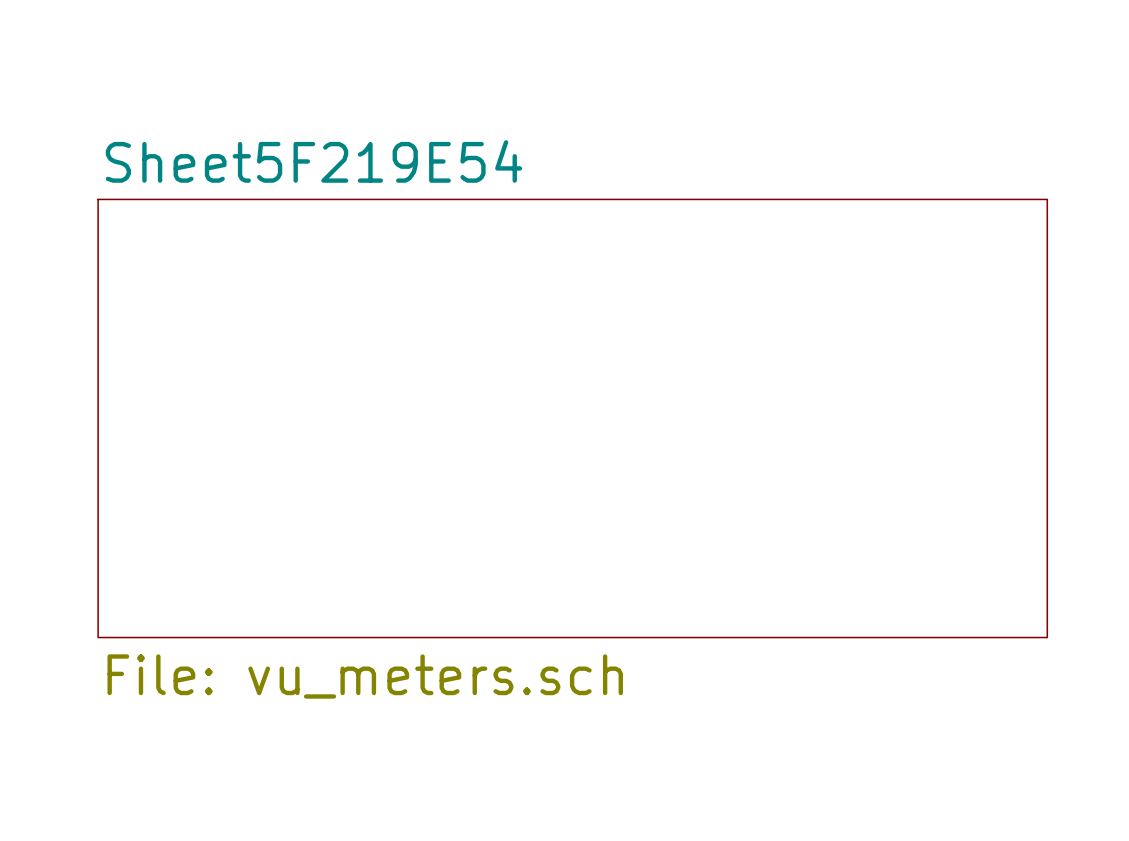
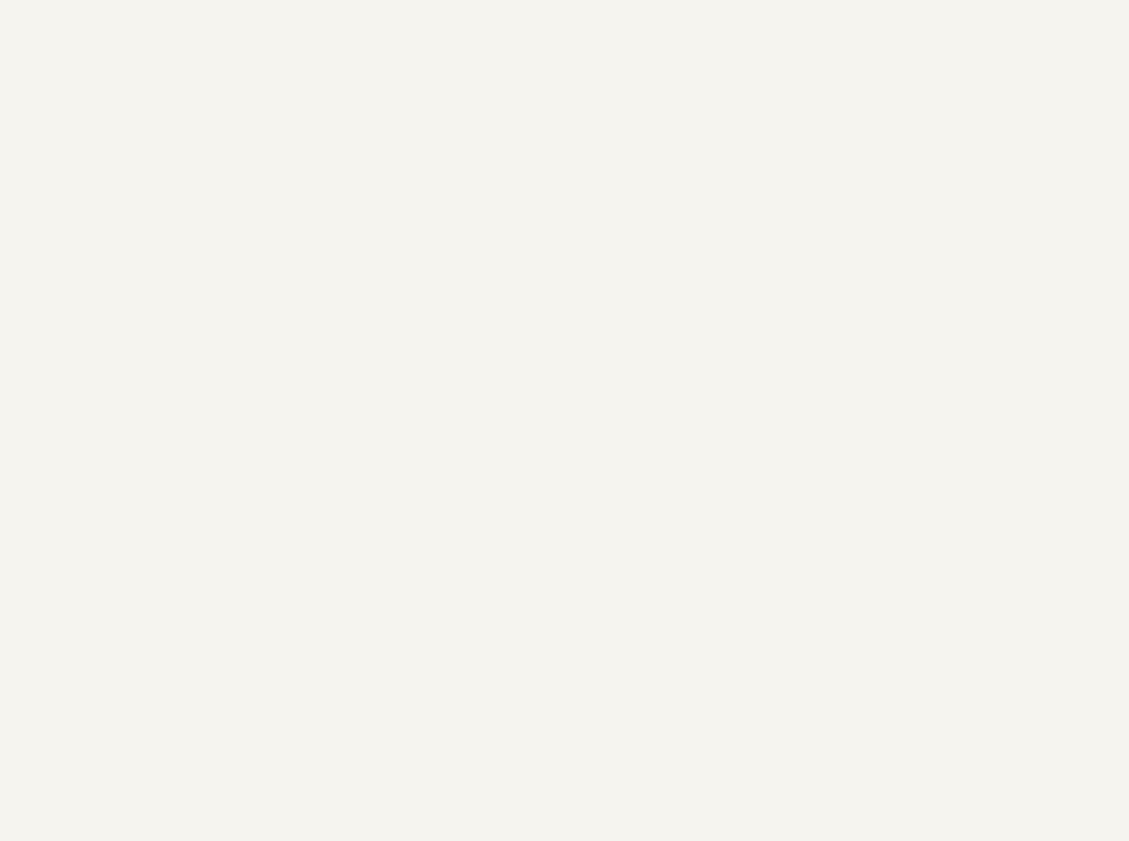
sheet Sheet5F219E54: File: vu_meters.sch (572, 418) -> none

